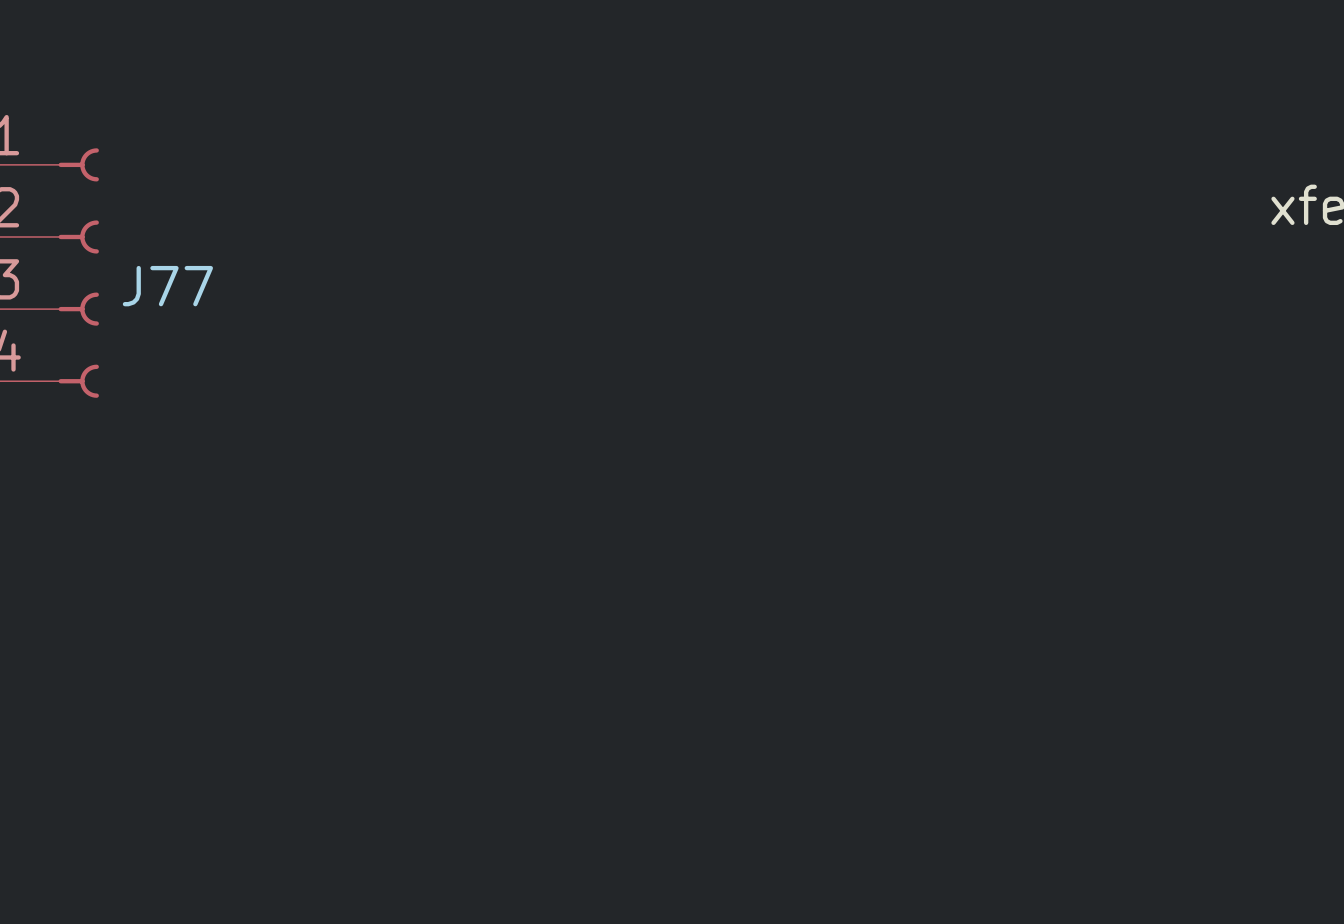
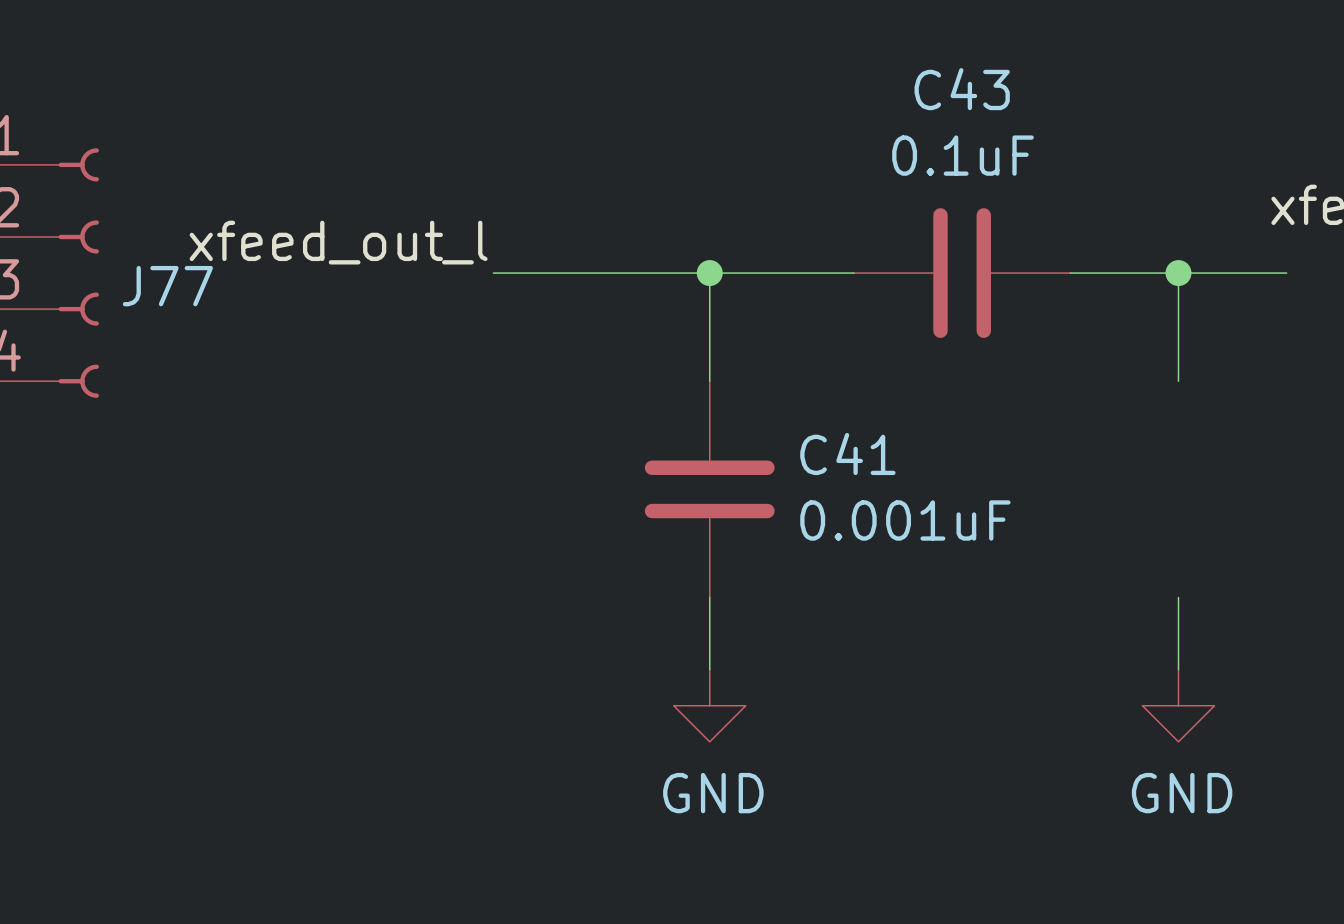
label: none -> xfeed_out_l (338, 242)
wire: none -> (493, 273) (853, 273)
wire: none -> (709, 273) (709, 381)
junction: none -> (709, 273)
C43: none -> 0.1uF (962, 273)
wire: none -> (1070, 273) (1286, 273)
wire: none -> (1178, 273) (1178, 381)
junction: none -> (1178, 273)
C41: none -> 0.001uF (709, 489)
wire: none -> (709, 597) (709, 669)
wire: none -> (1178, 597) (1178, 669)
power symbol: none -> GND (709, 705)
power symbol: none -> GND (1178, 705)

